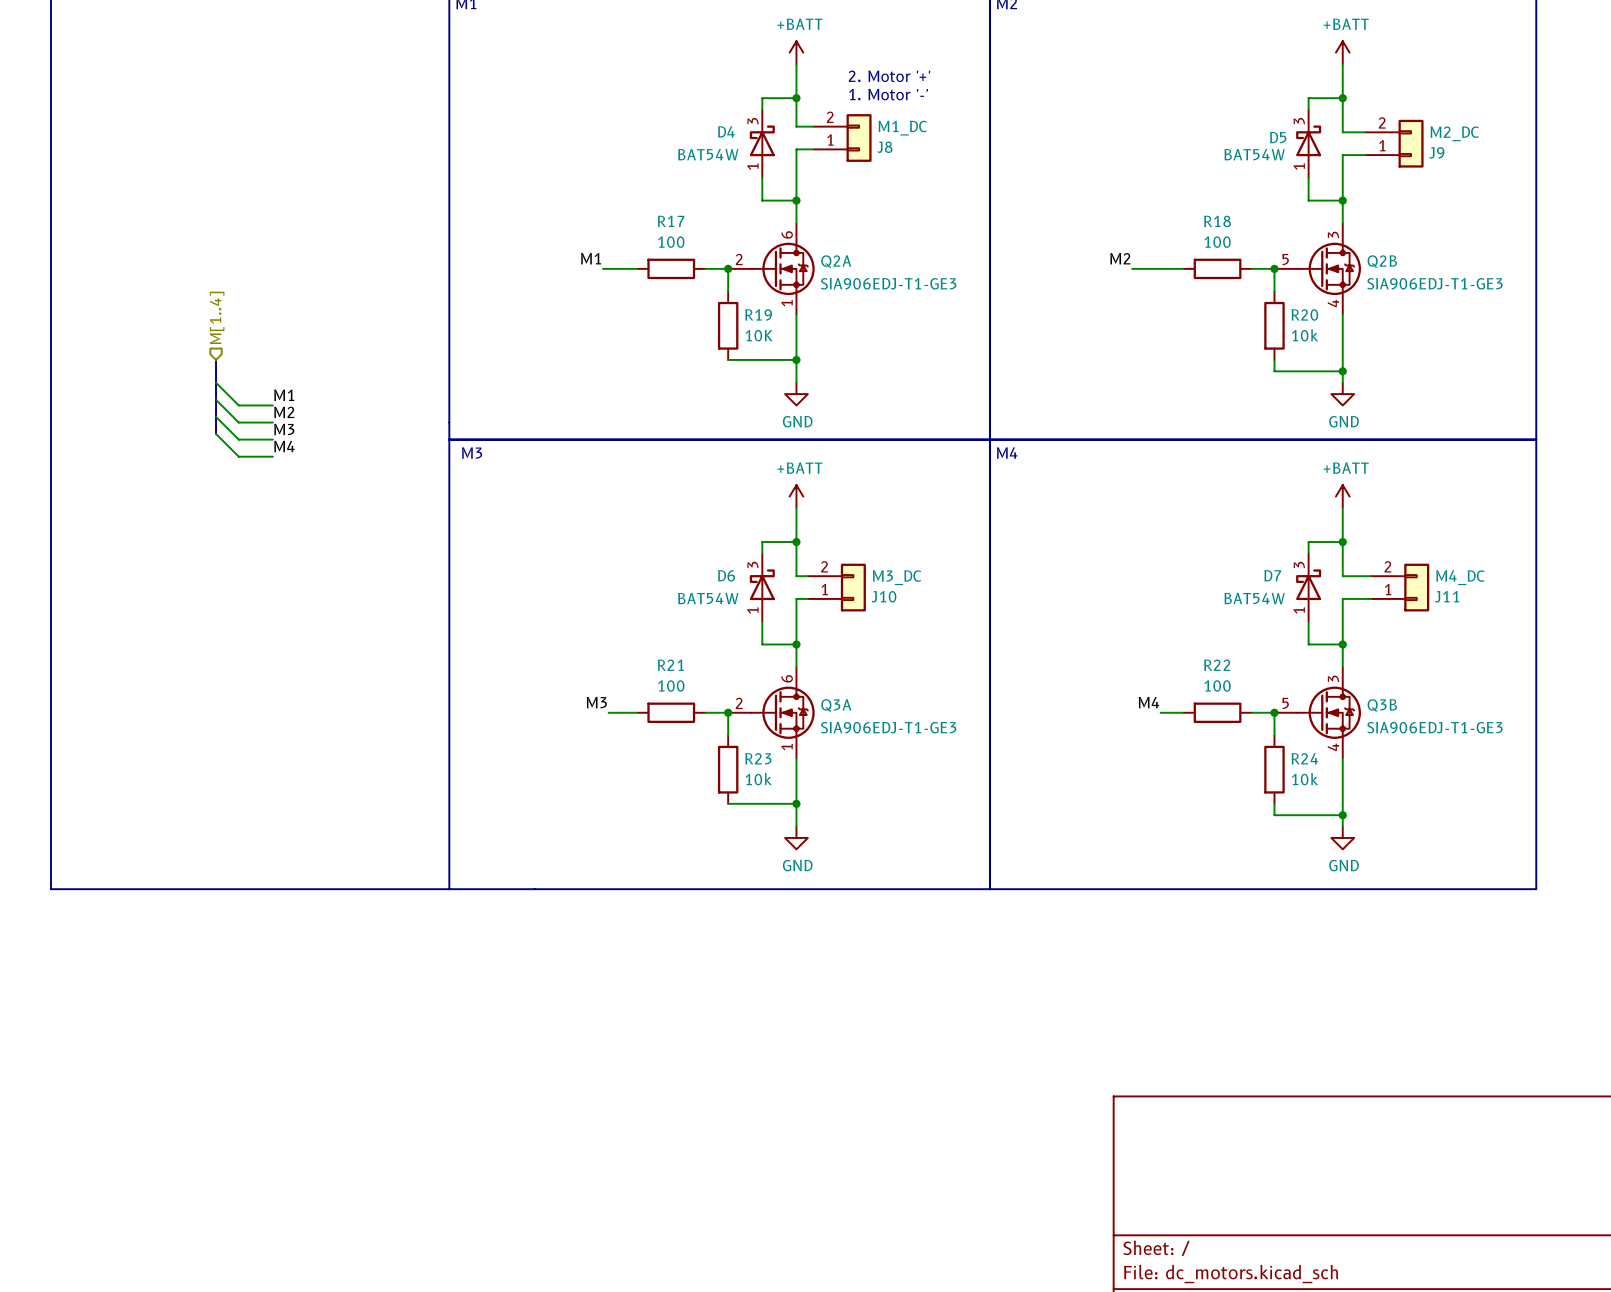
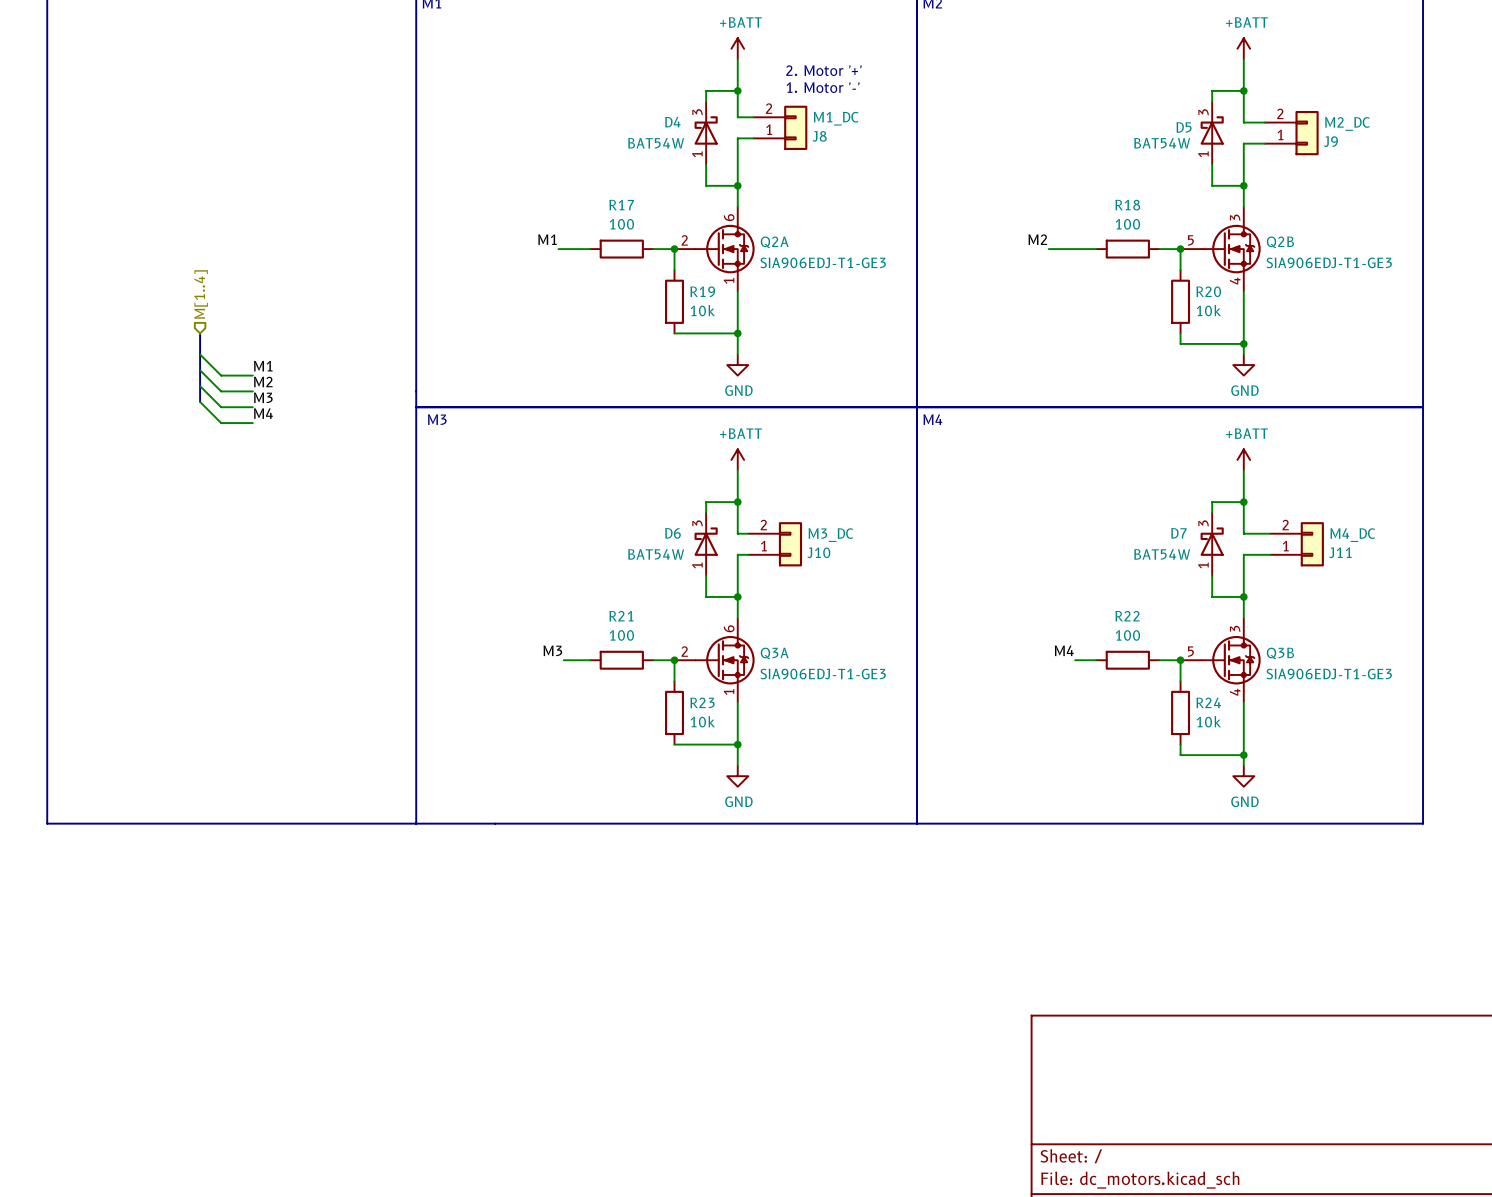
R19 value: 10K (759, 335) -> 10k (702, 310)

